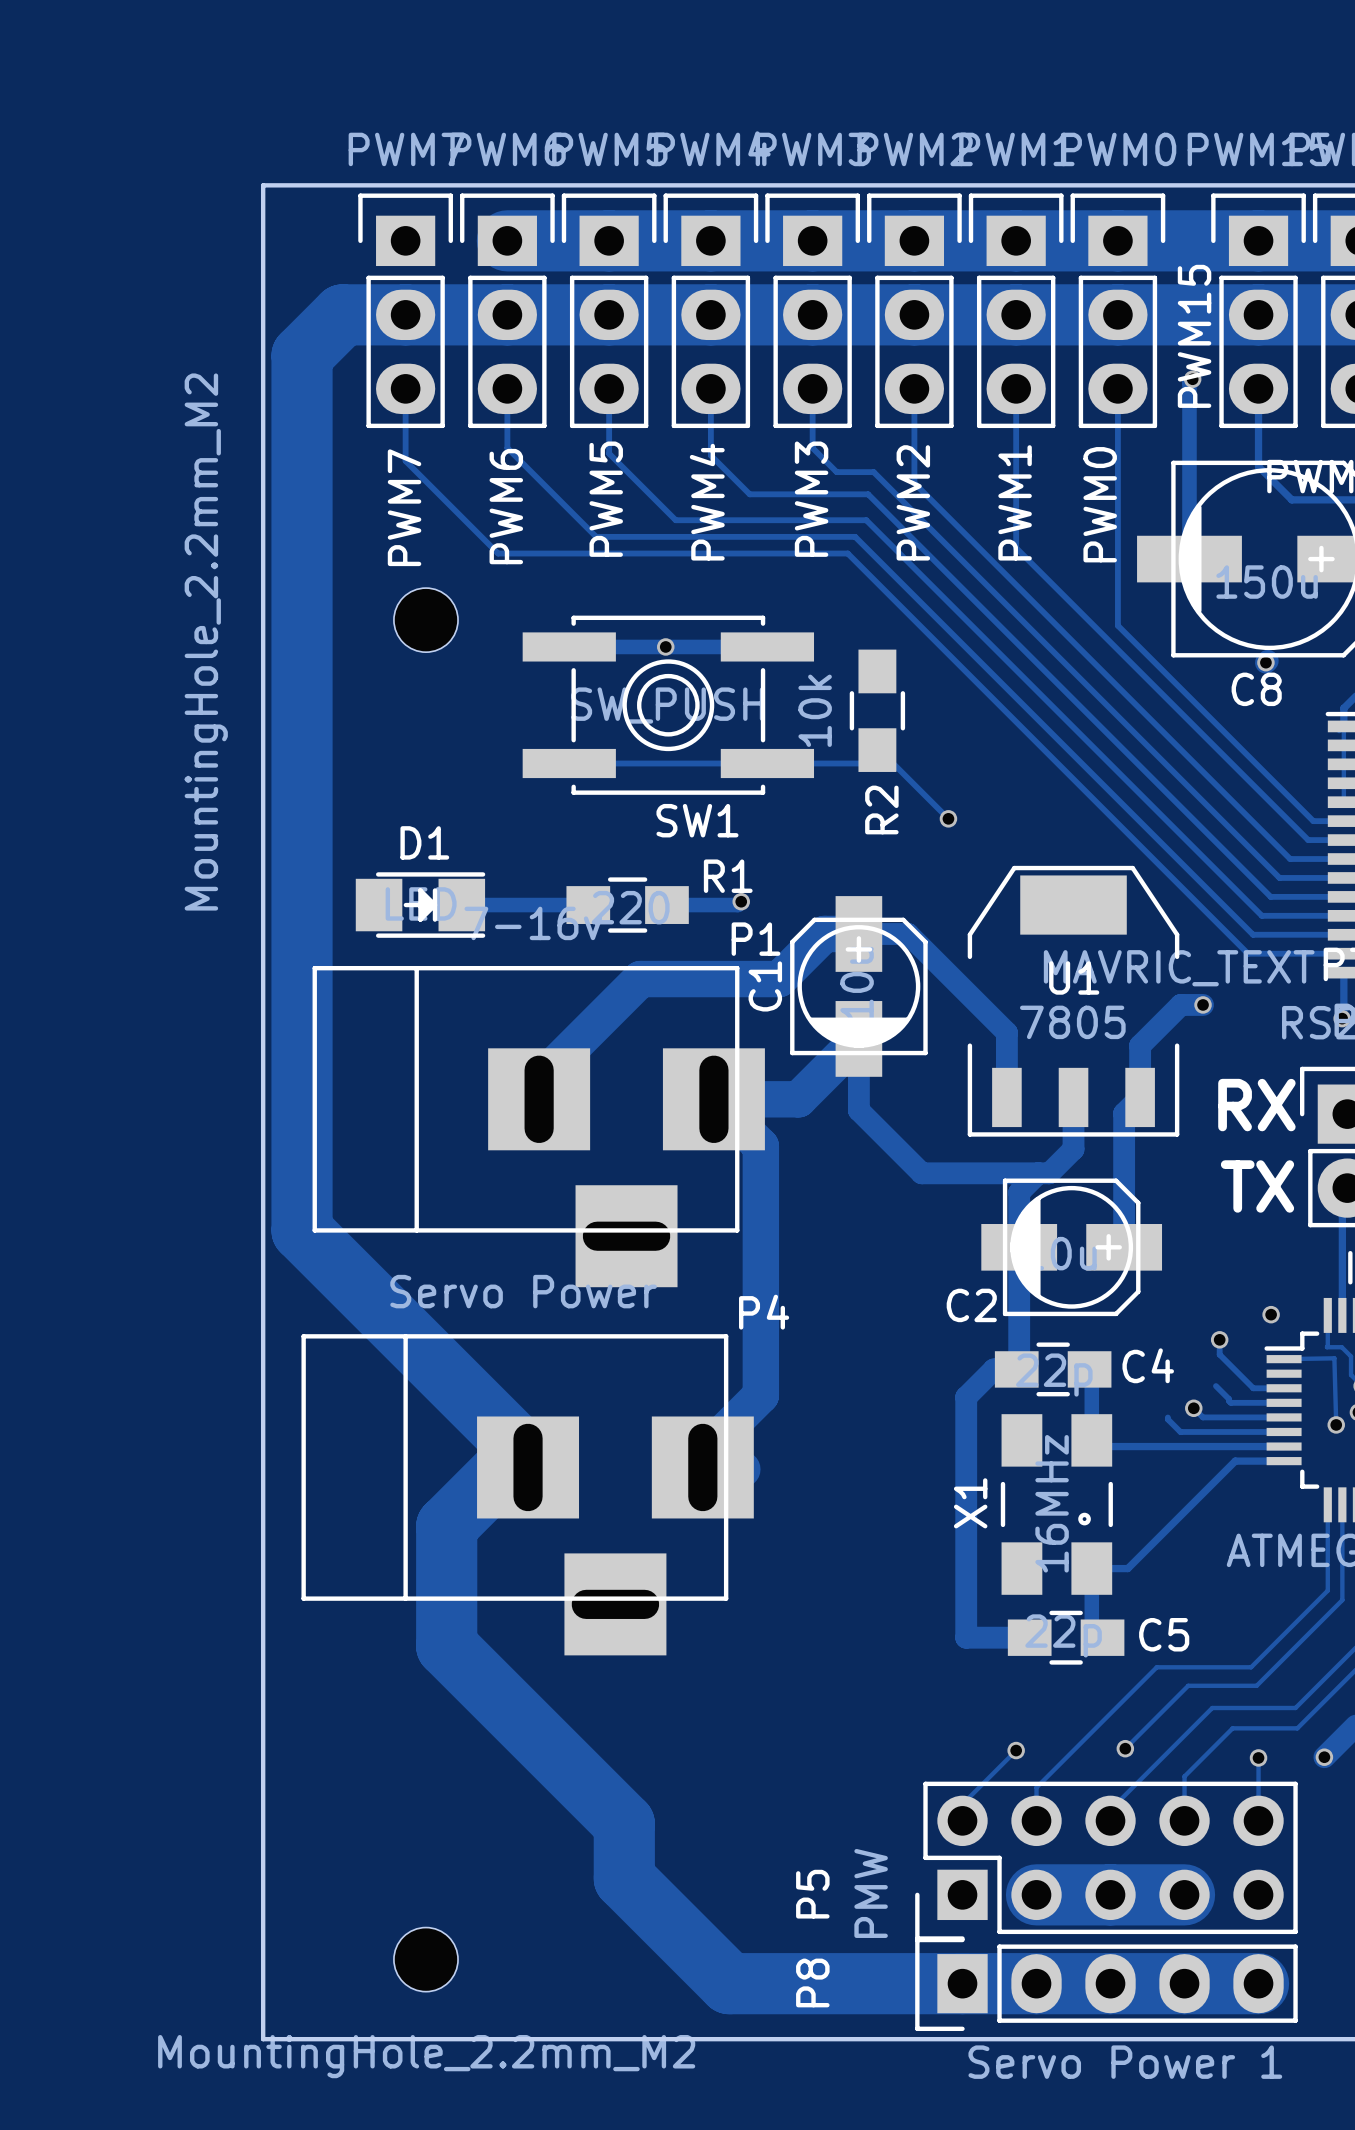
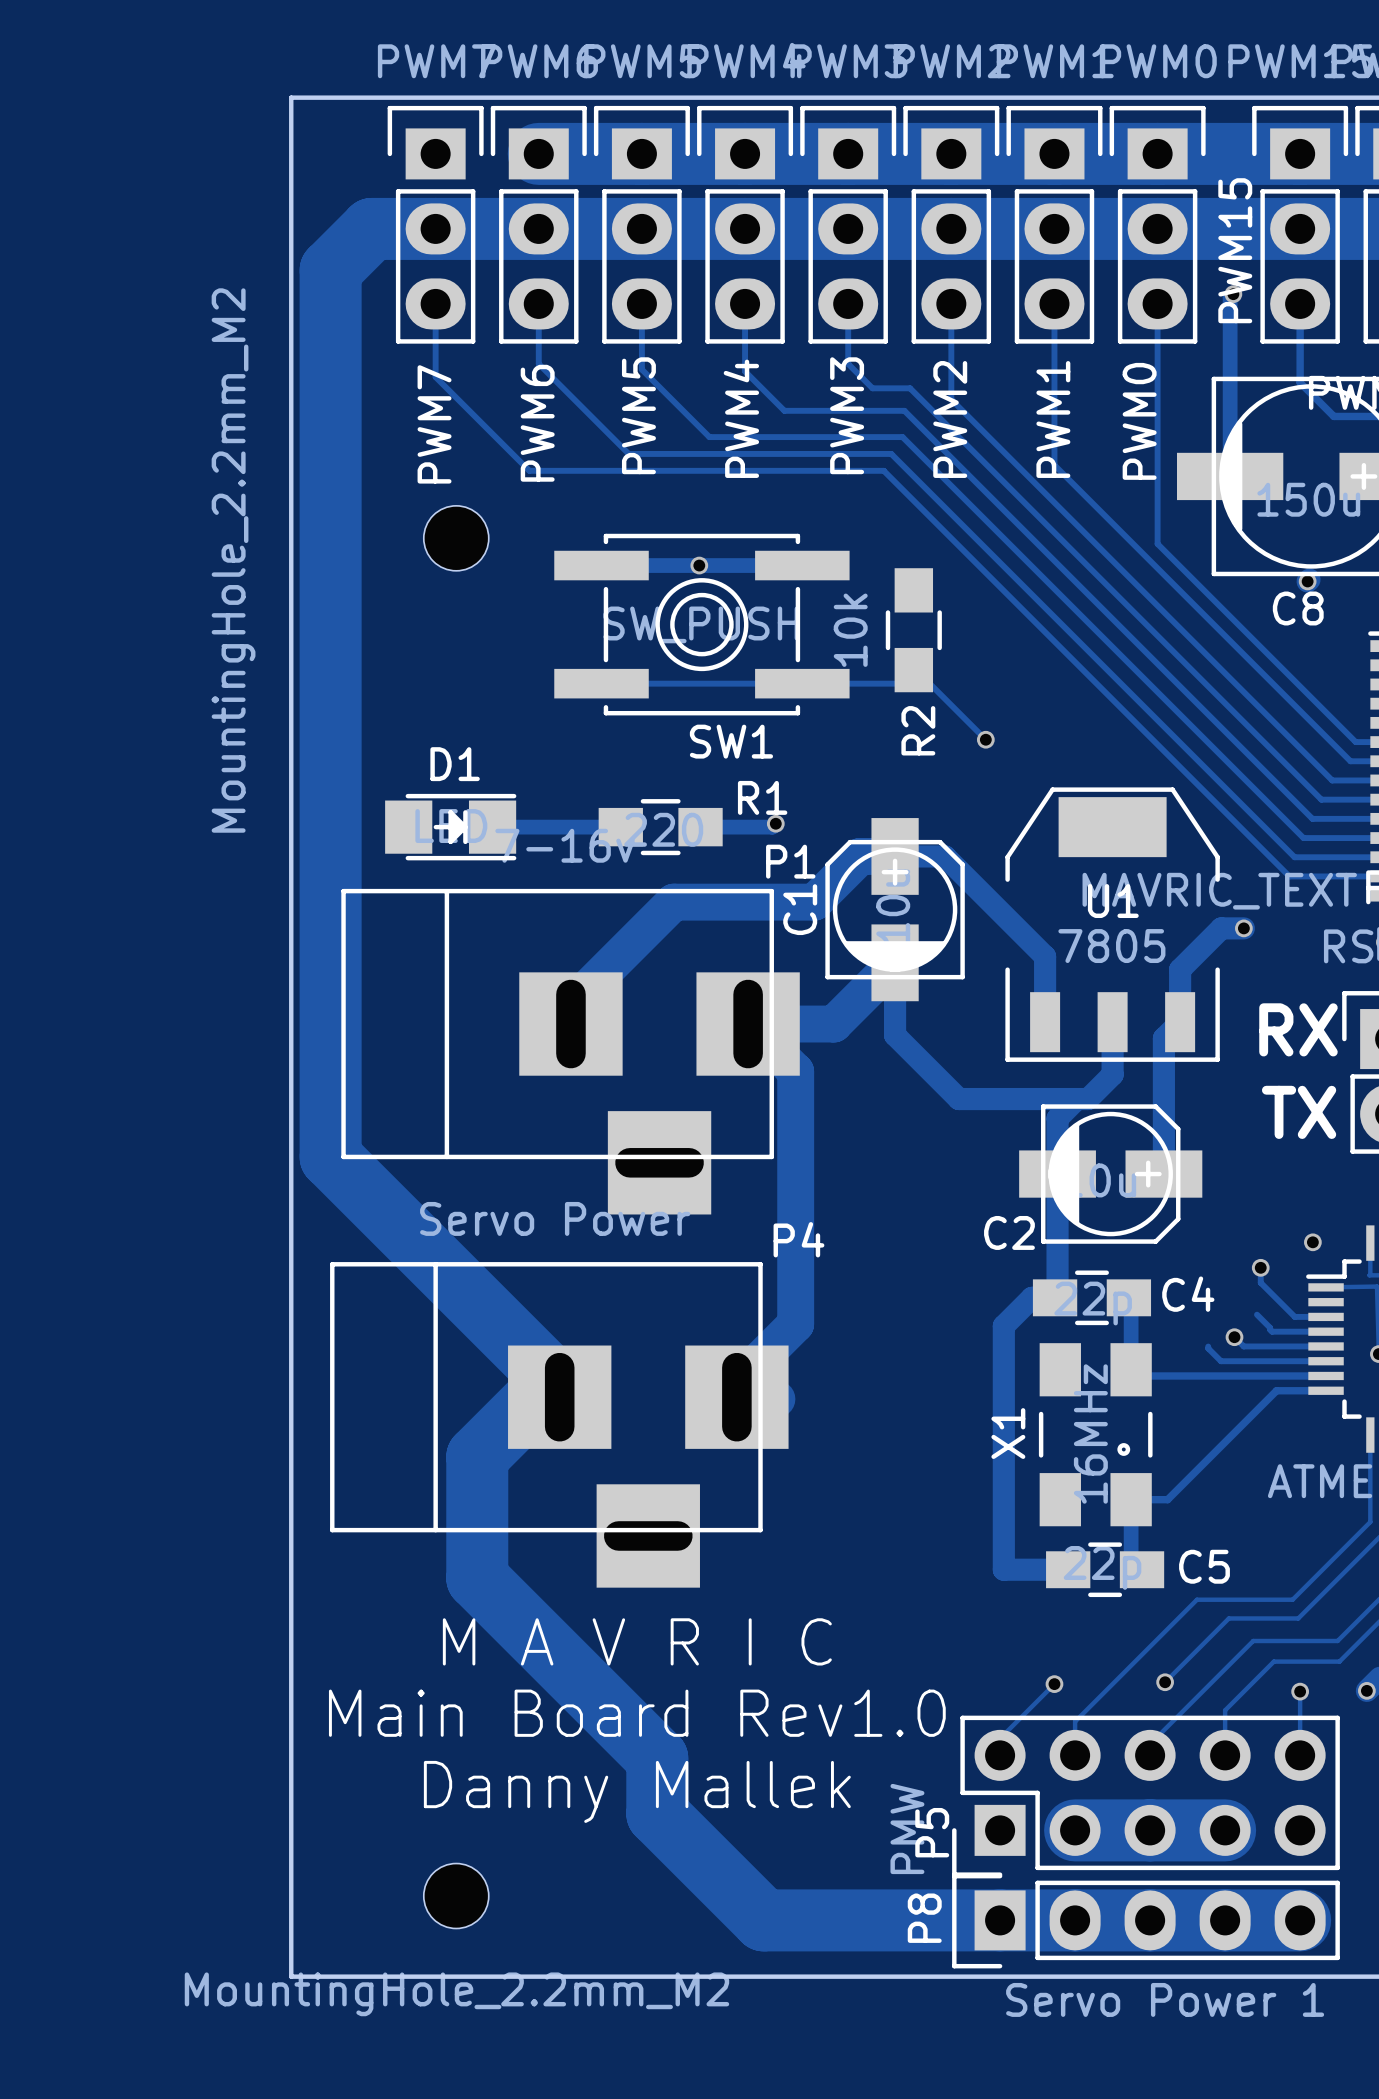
text: none -> M A V R I C (637, 1641)
text: none -> Main Board Rev1.0 (637, 1713)
text: none -> Danny Mallek (637, 1791)
P5 name position: P5 (812, 1894) -> P5 (932, 1832)
P8 name position: P8 (812, 1982) -> P8 (924, 1918)

